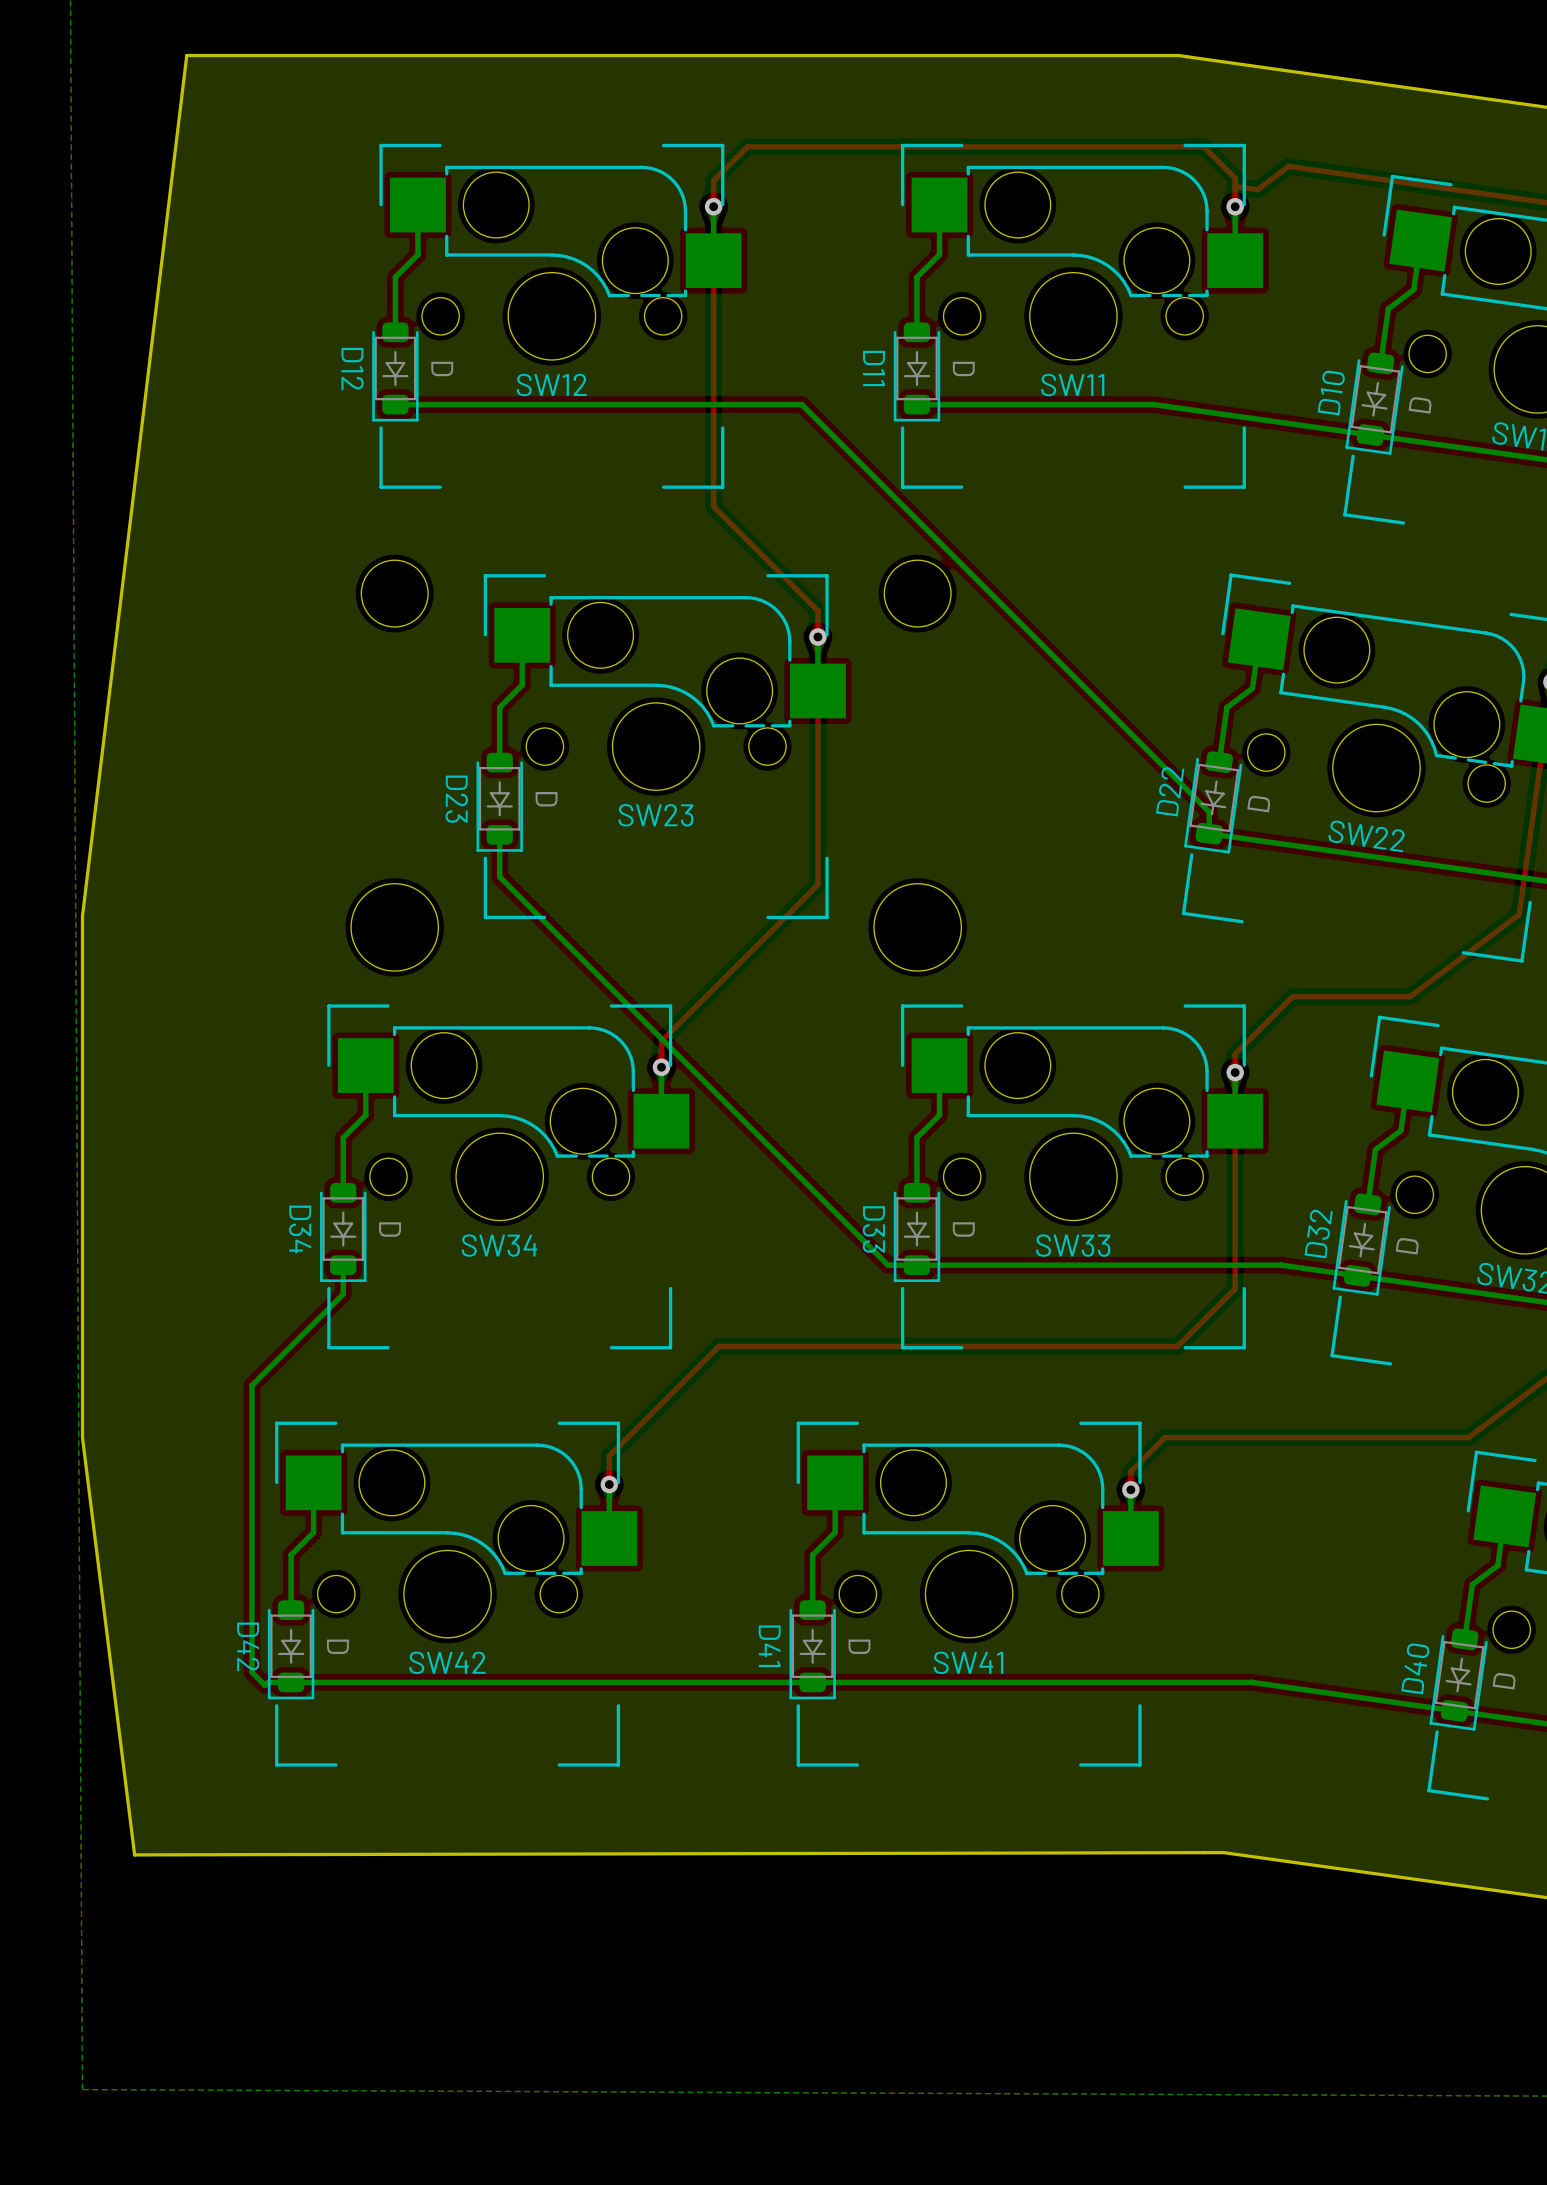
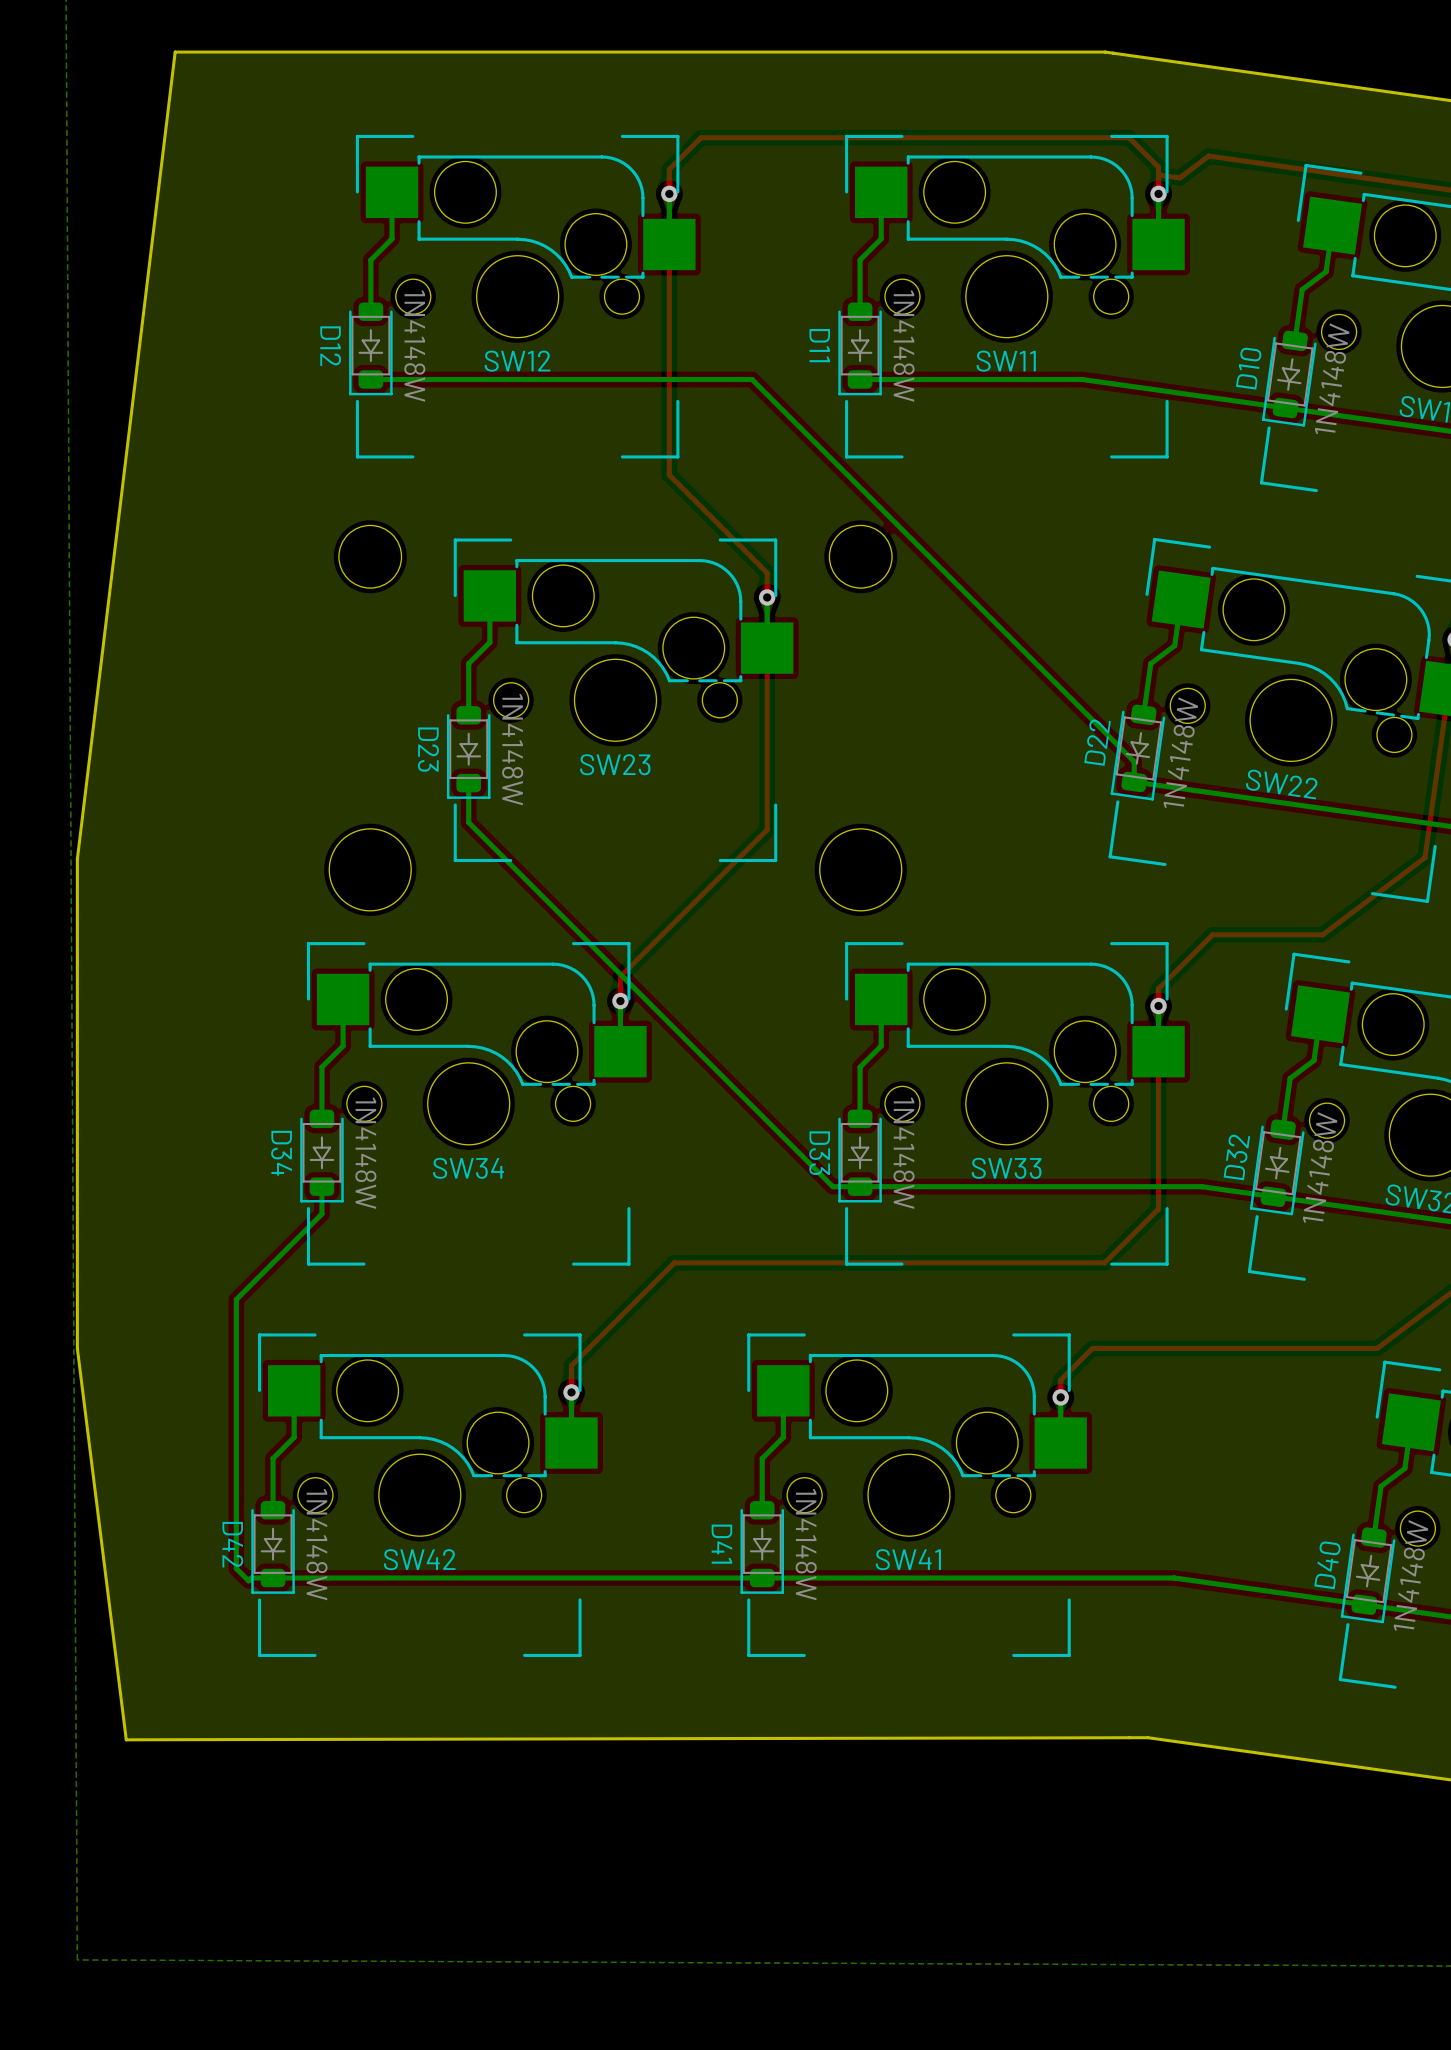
D12 value: D (442, 368) -> 1N4148W (414, 346)
D11 value: D (963, 368) -> 1N4148W (904, 346)
D10 value: D (1420, 405) -> 1N4148W (1332, 378)
D23 value: D (546, 799) -> 1N4148W (512, 749)
D22 value: D (1258, 803) -> 1N4148W (1180, 752)
D34 value: D (390, 1229) -> 1N4148W (365, 1153)
D33 value: D (963, 1229) -> 1N4148W (904, 1153)
D32 value: D (1407, 1246) -> 1N4148W (1320, 1167)
D42 value: D (337, 1646) -> 1N4148W (316, 1544)
D41 value: D (859, 1646) -> 1N4148W (806, 1544)
D40 value: D (1504, 1681) -> 1N4148W (1411, 1575)

